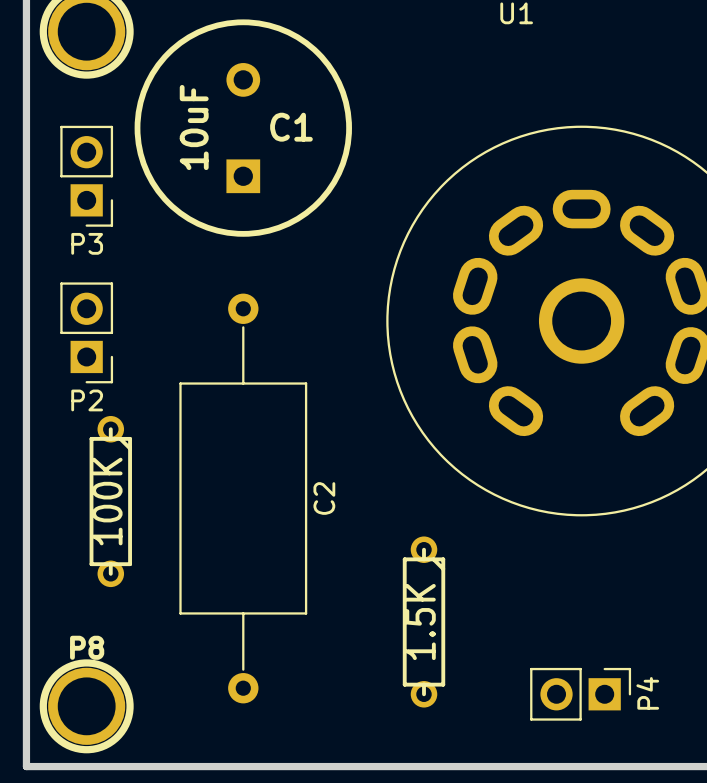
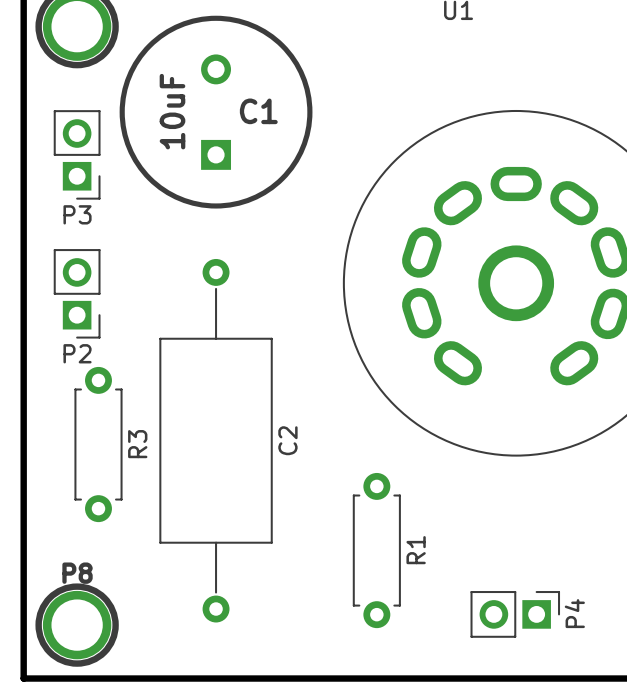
part: 100K (110, 501) -> none
R3: none -> (98, 444)
part: 1.5K (424, 622) -> none
R1: none -> (376, 550)

